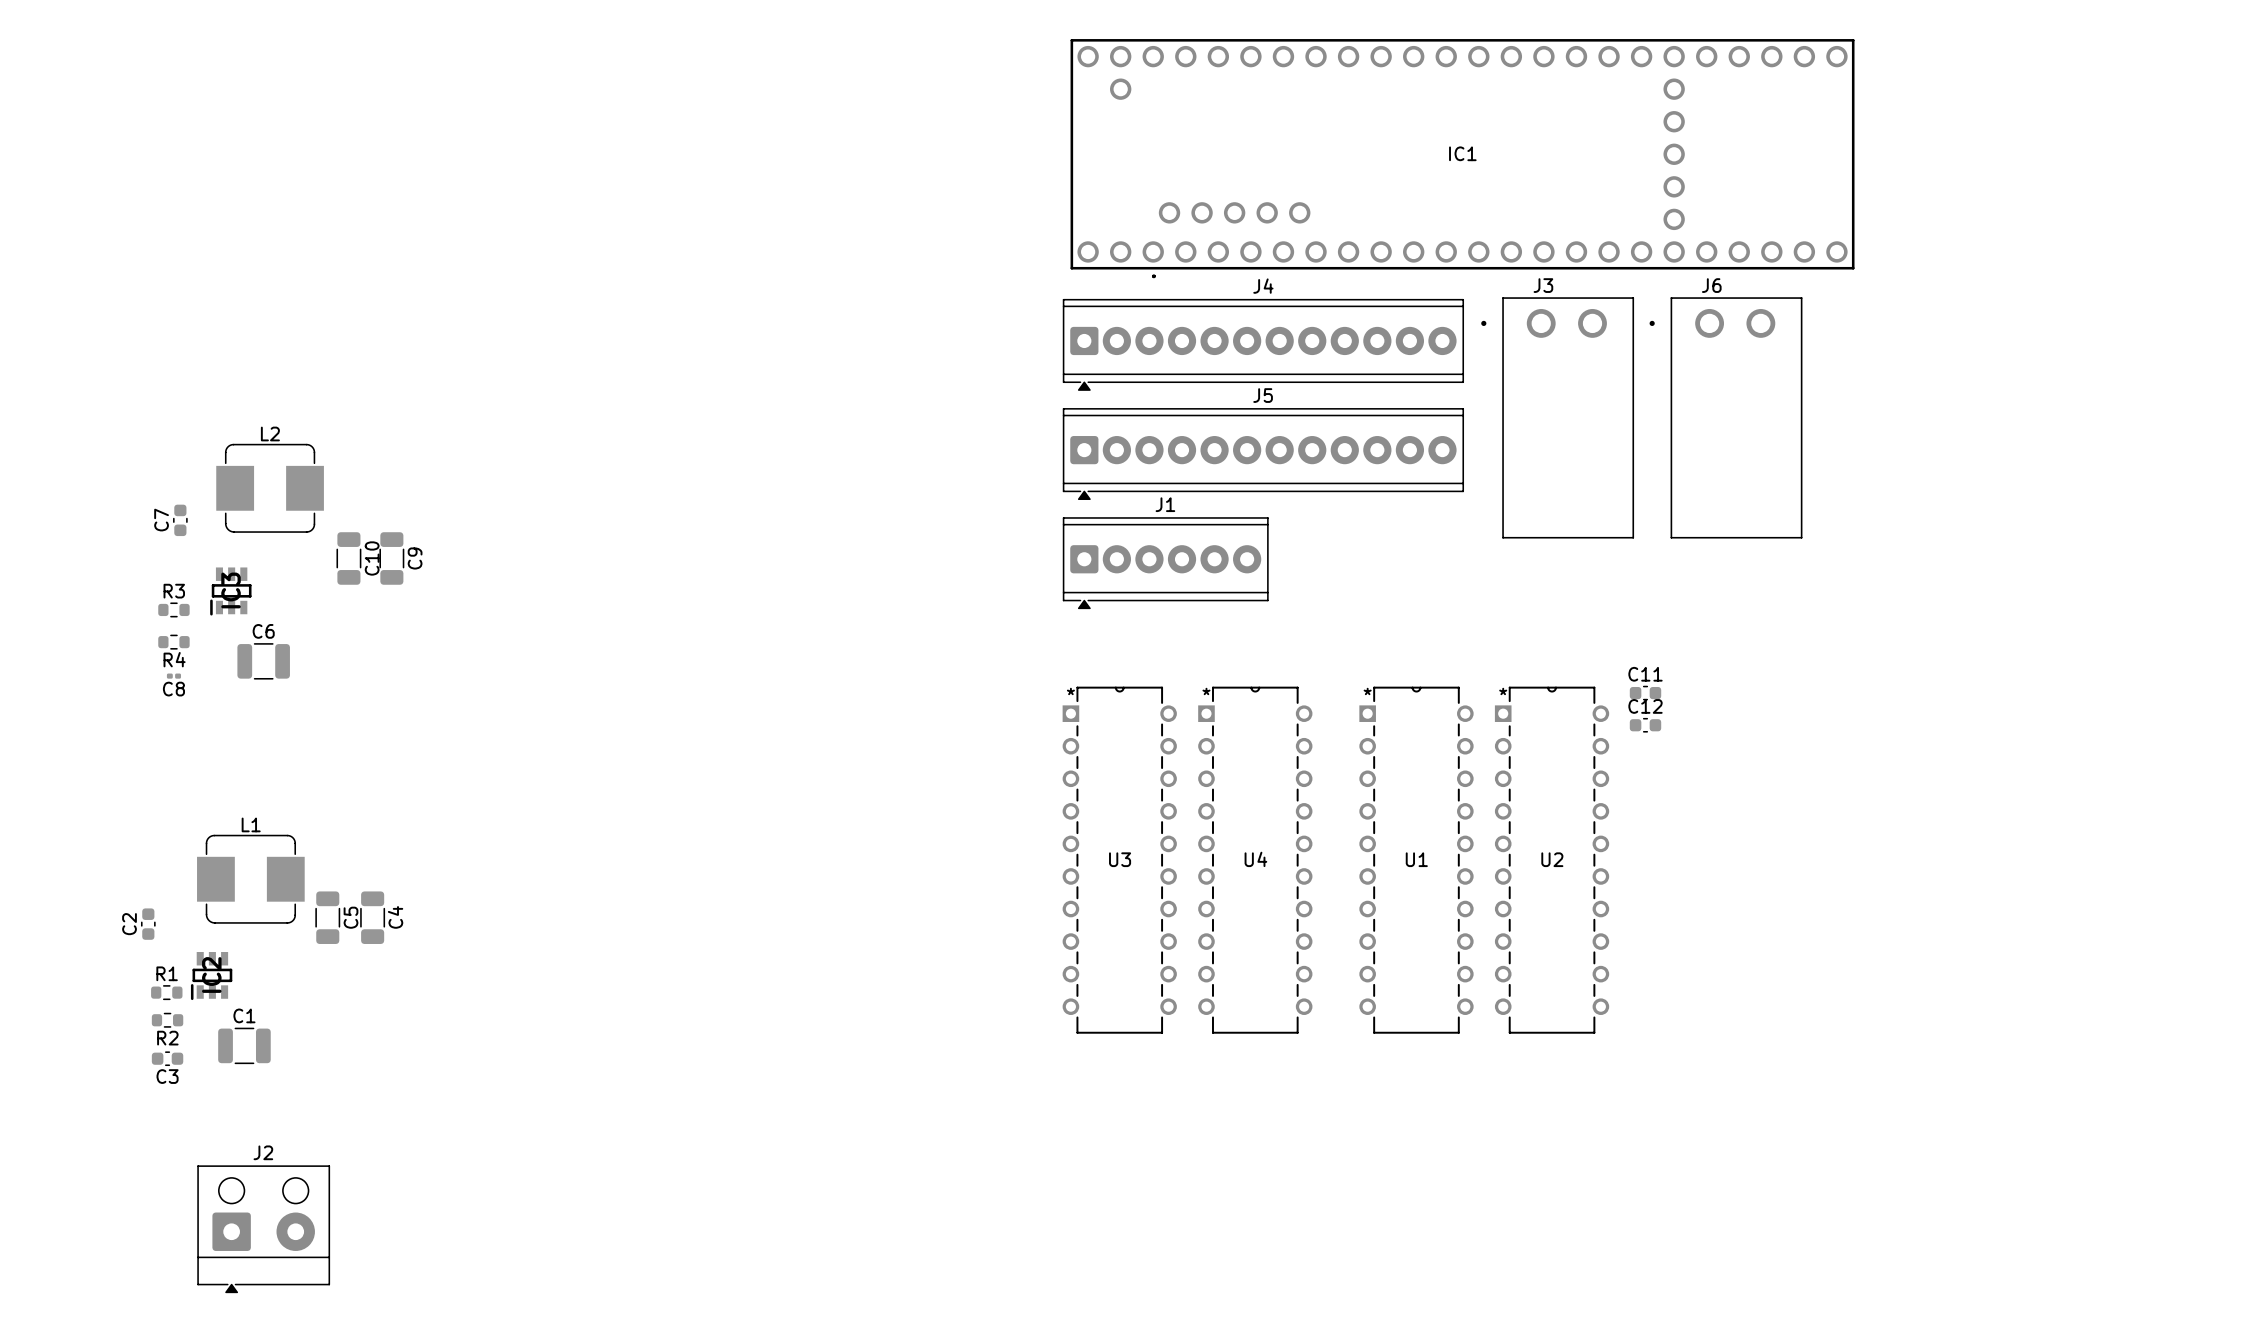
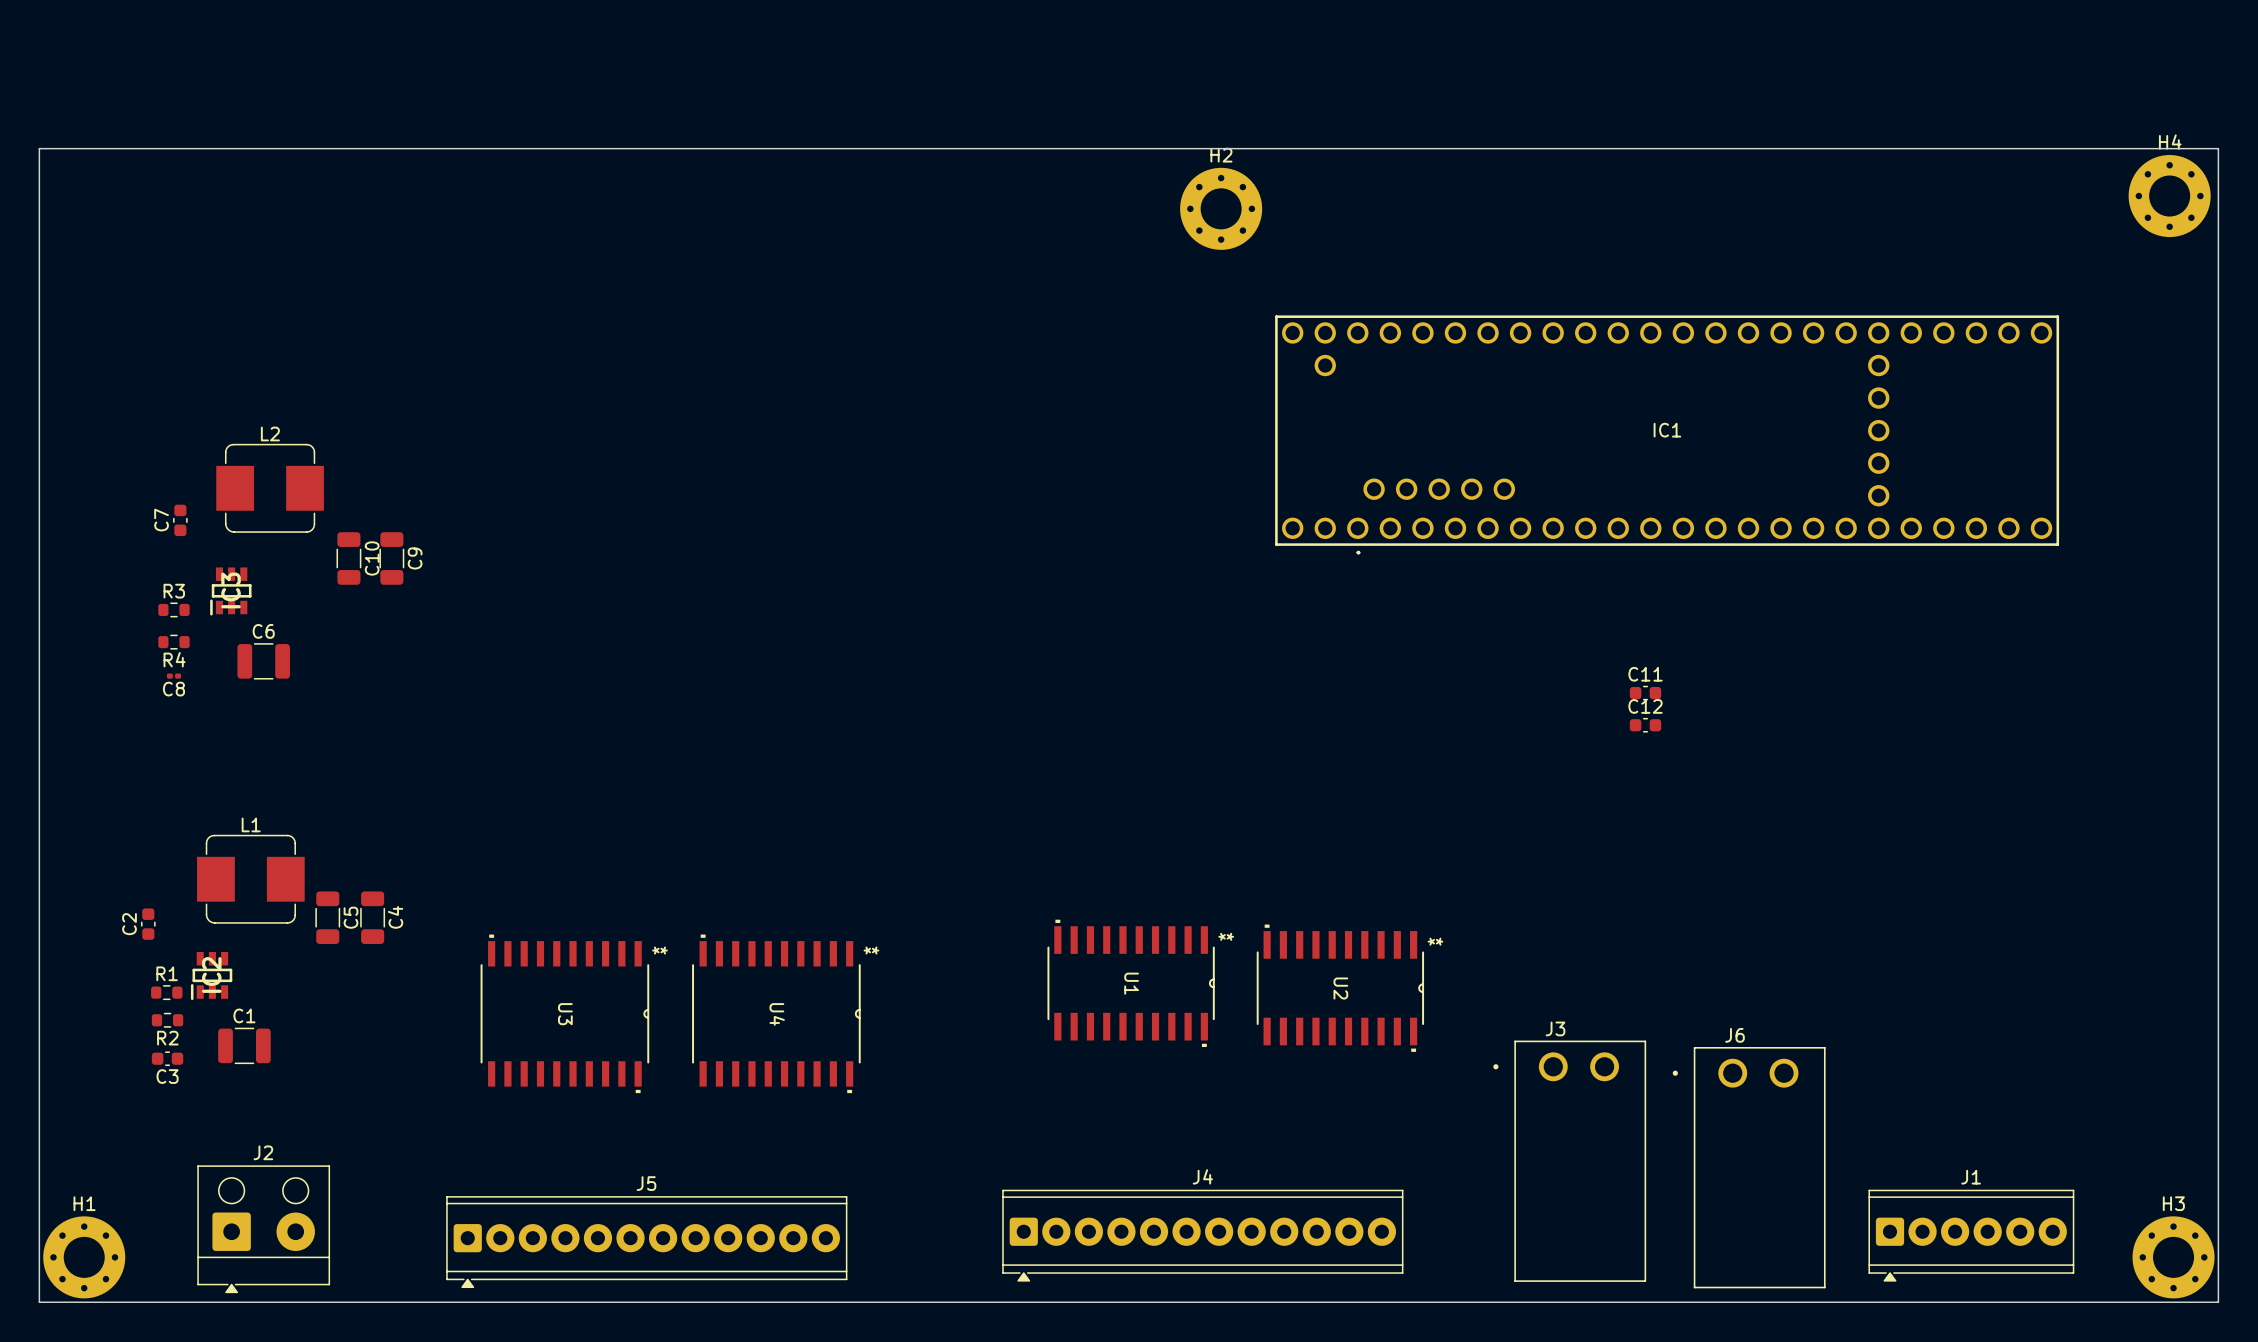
board edge: none -> (39, 148) (2218, 148) (2218, 1302) (39, 1302) (39, 148)
IC1 position: (1462, 158) -> (1667, 434)
H4: none -> (2169, 196)
H2: none -> (1221, 208)
J4 position: (1263, 344) -> (1202, 1235)
J3 position: (1557, 417) -> (1569, 1161)
J6 position: (1726, 417) -> (1749, 1167)
J5 position: (1263, 454) -> (646, 1242)
J1 position: (1165, 563) -> (1971, 1235)
U3 footprint: [1062, 686, 1177, 1034] -> [480, 934, 650, 1094]
U4 footprint: [1198, 686, 1313, 1034] -> [692, 934, 861, 1094]
U1 footprint: [1359, 686, 1474, 1034] -> [1047, 919, 1215, 1048]
U2 footprint: [1494, 686, 1610, 1034] -> [1256, 924, 1425, 1052]
H1: none -> (84, 1257)
H3: none -> (2173, 1257)

